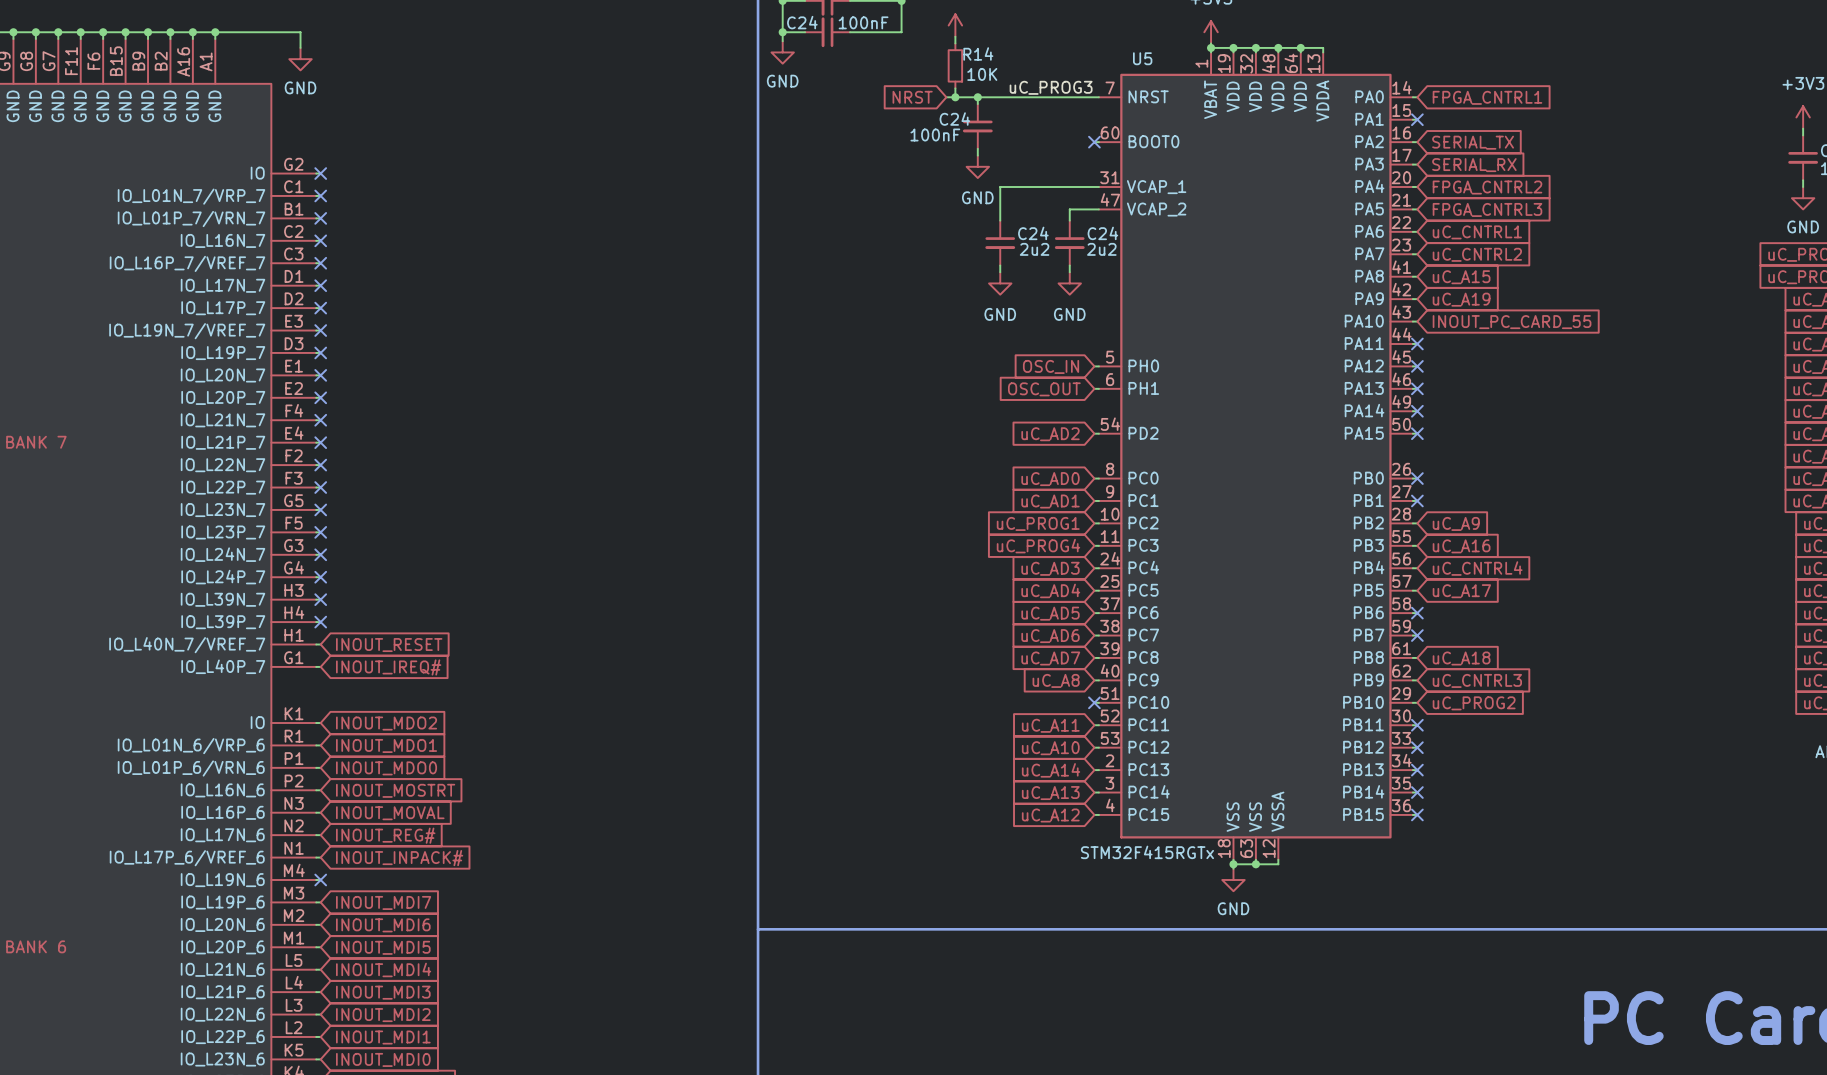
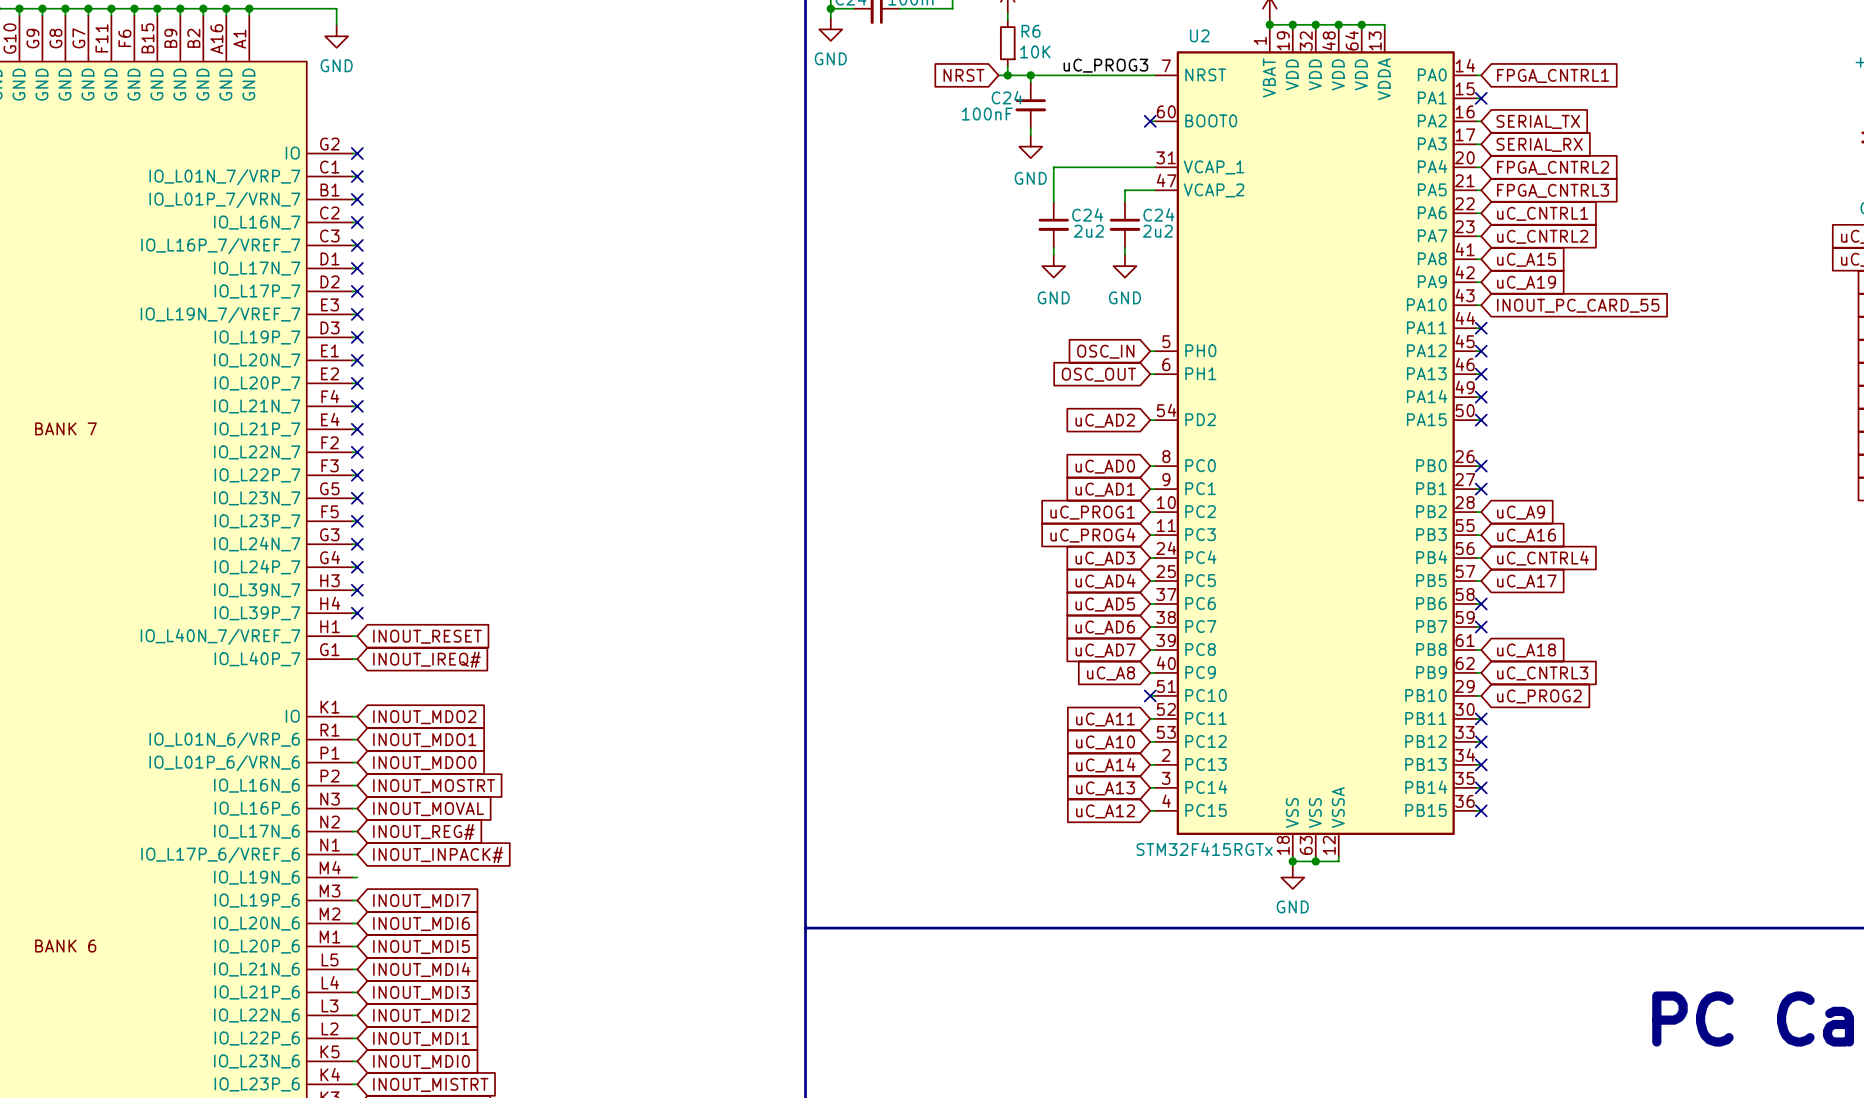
R14 name: R14 (978, 53) -> R6 (1031, 31)
U5 name: U5 (1142, 58) -> U2 (1199, 35)
no-connect mark: (320, 879) -> none

